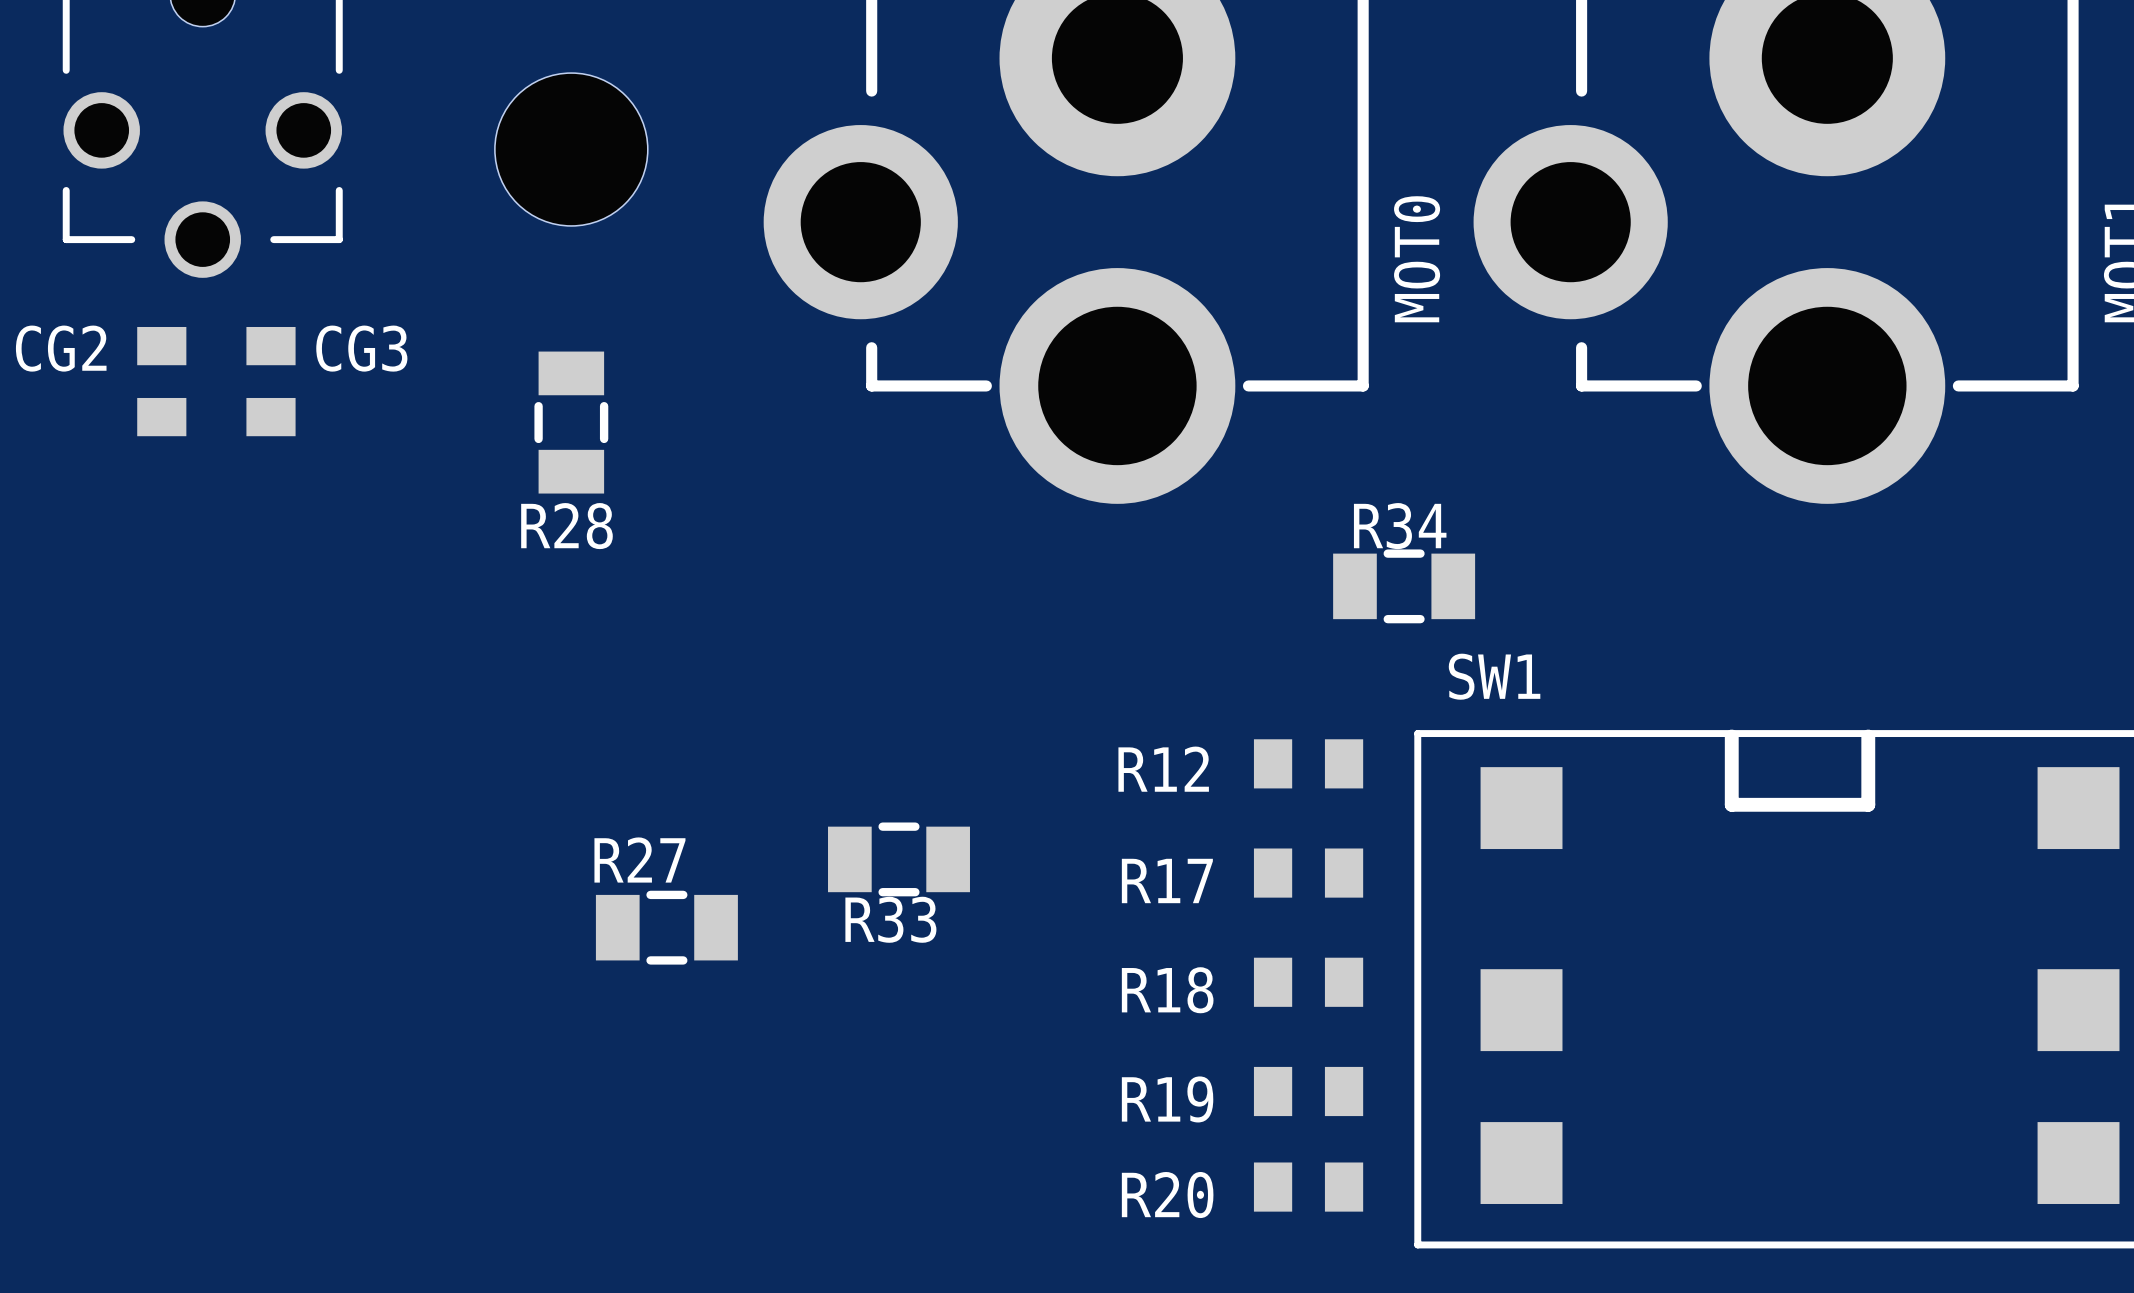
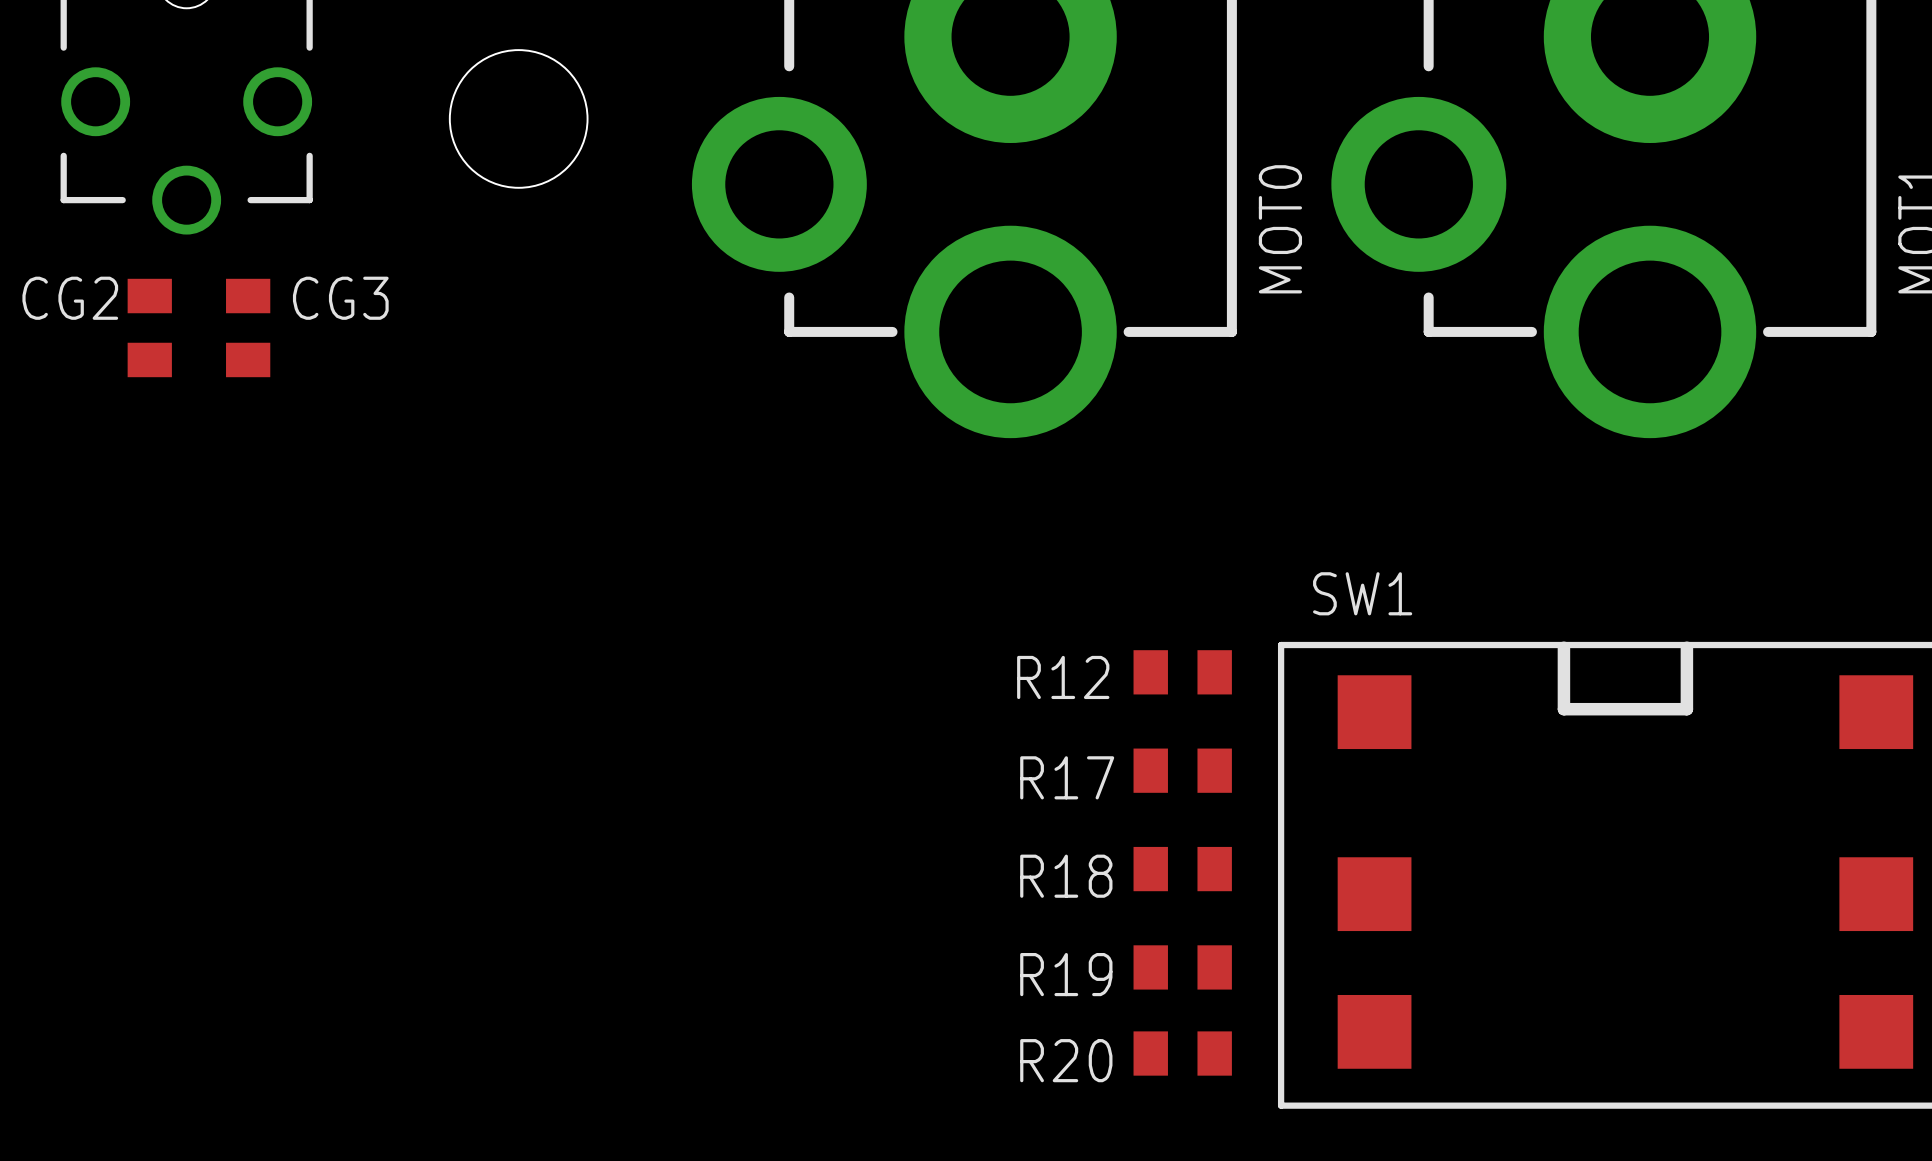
R28: (571, 422) -> none
R34: (1404, 586) -> none
R33: (898, 859) -> none
R27: (666, 927) -> none

